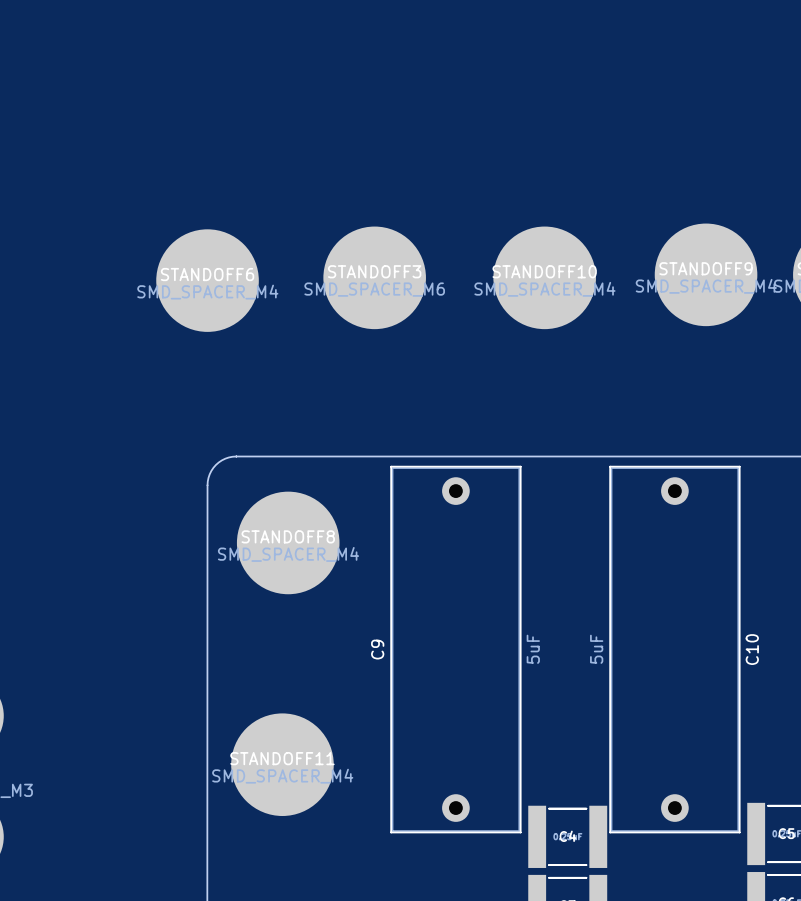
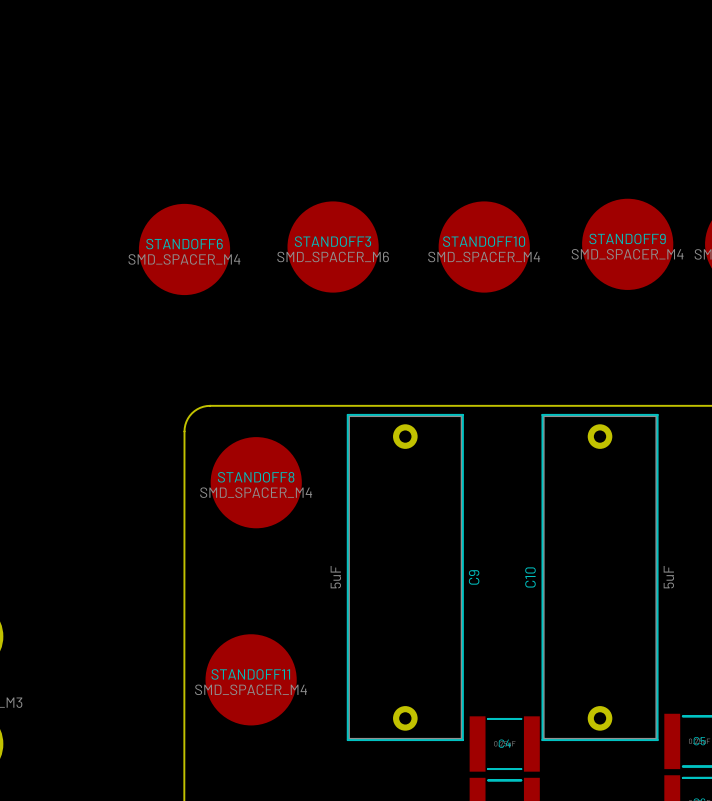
C9 name position: C9 (377, 649) -> C9 (474, 577)
C9 value position: 5uF (533, 649) -> 5uF (335, 577)
C10 value position: 5uF (596, 649) -> 5uF (668, 577)
C10 name position: C10 (752, 649) -> C10 (530, 577)

